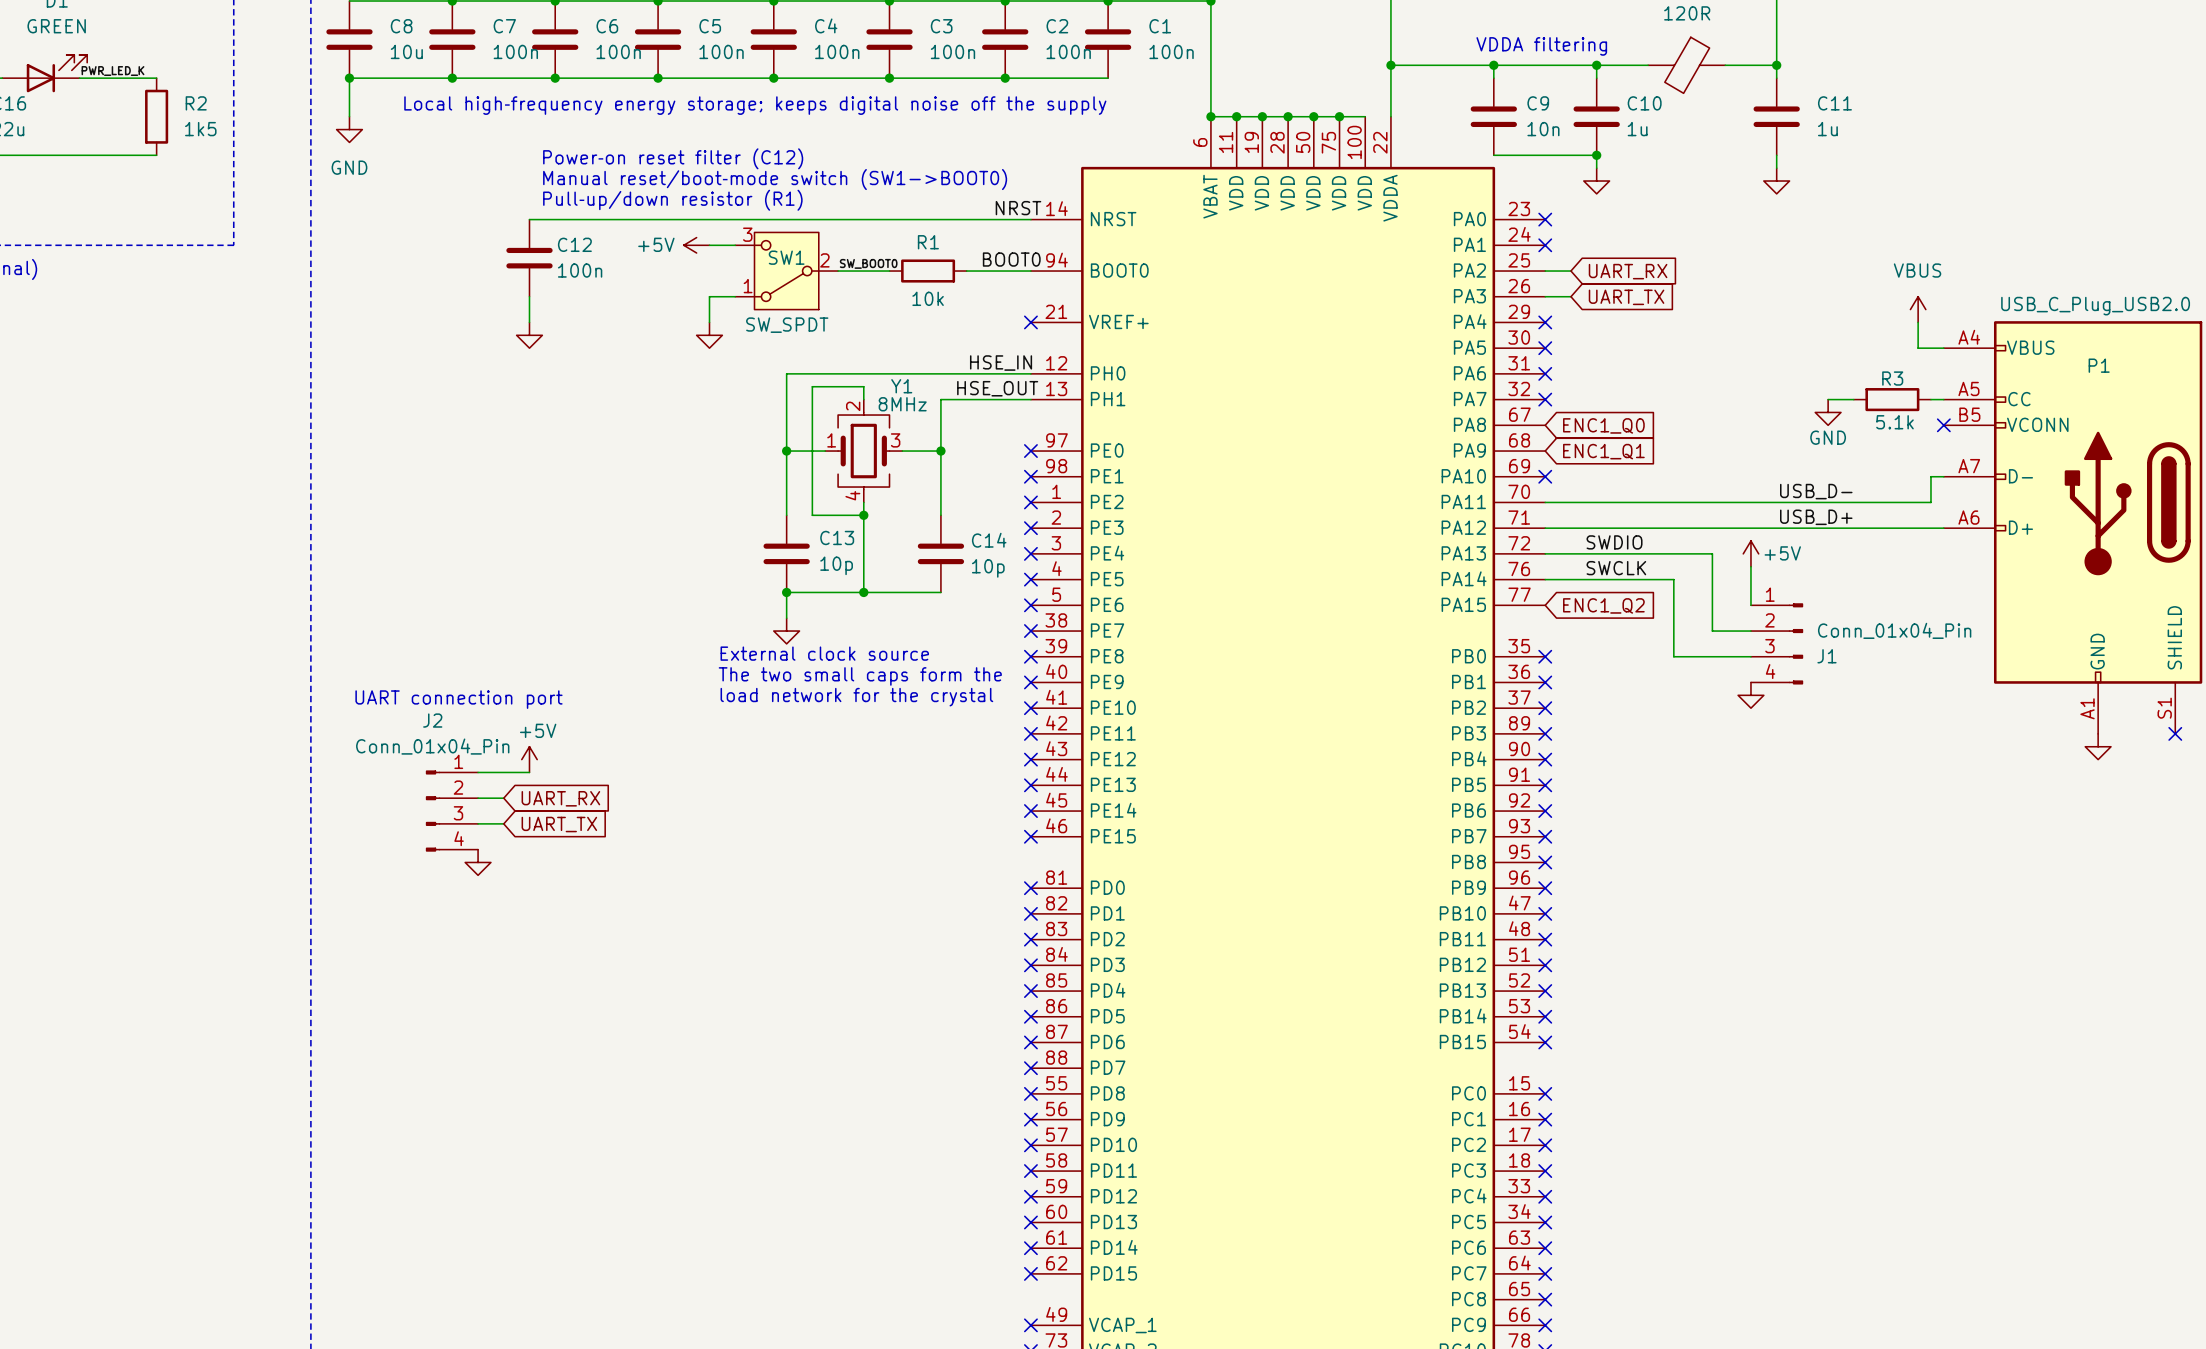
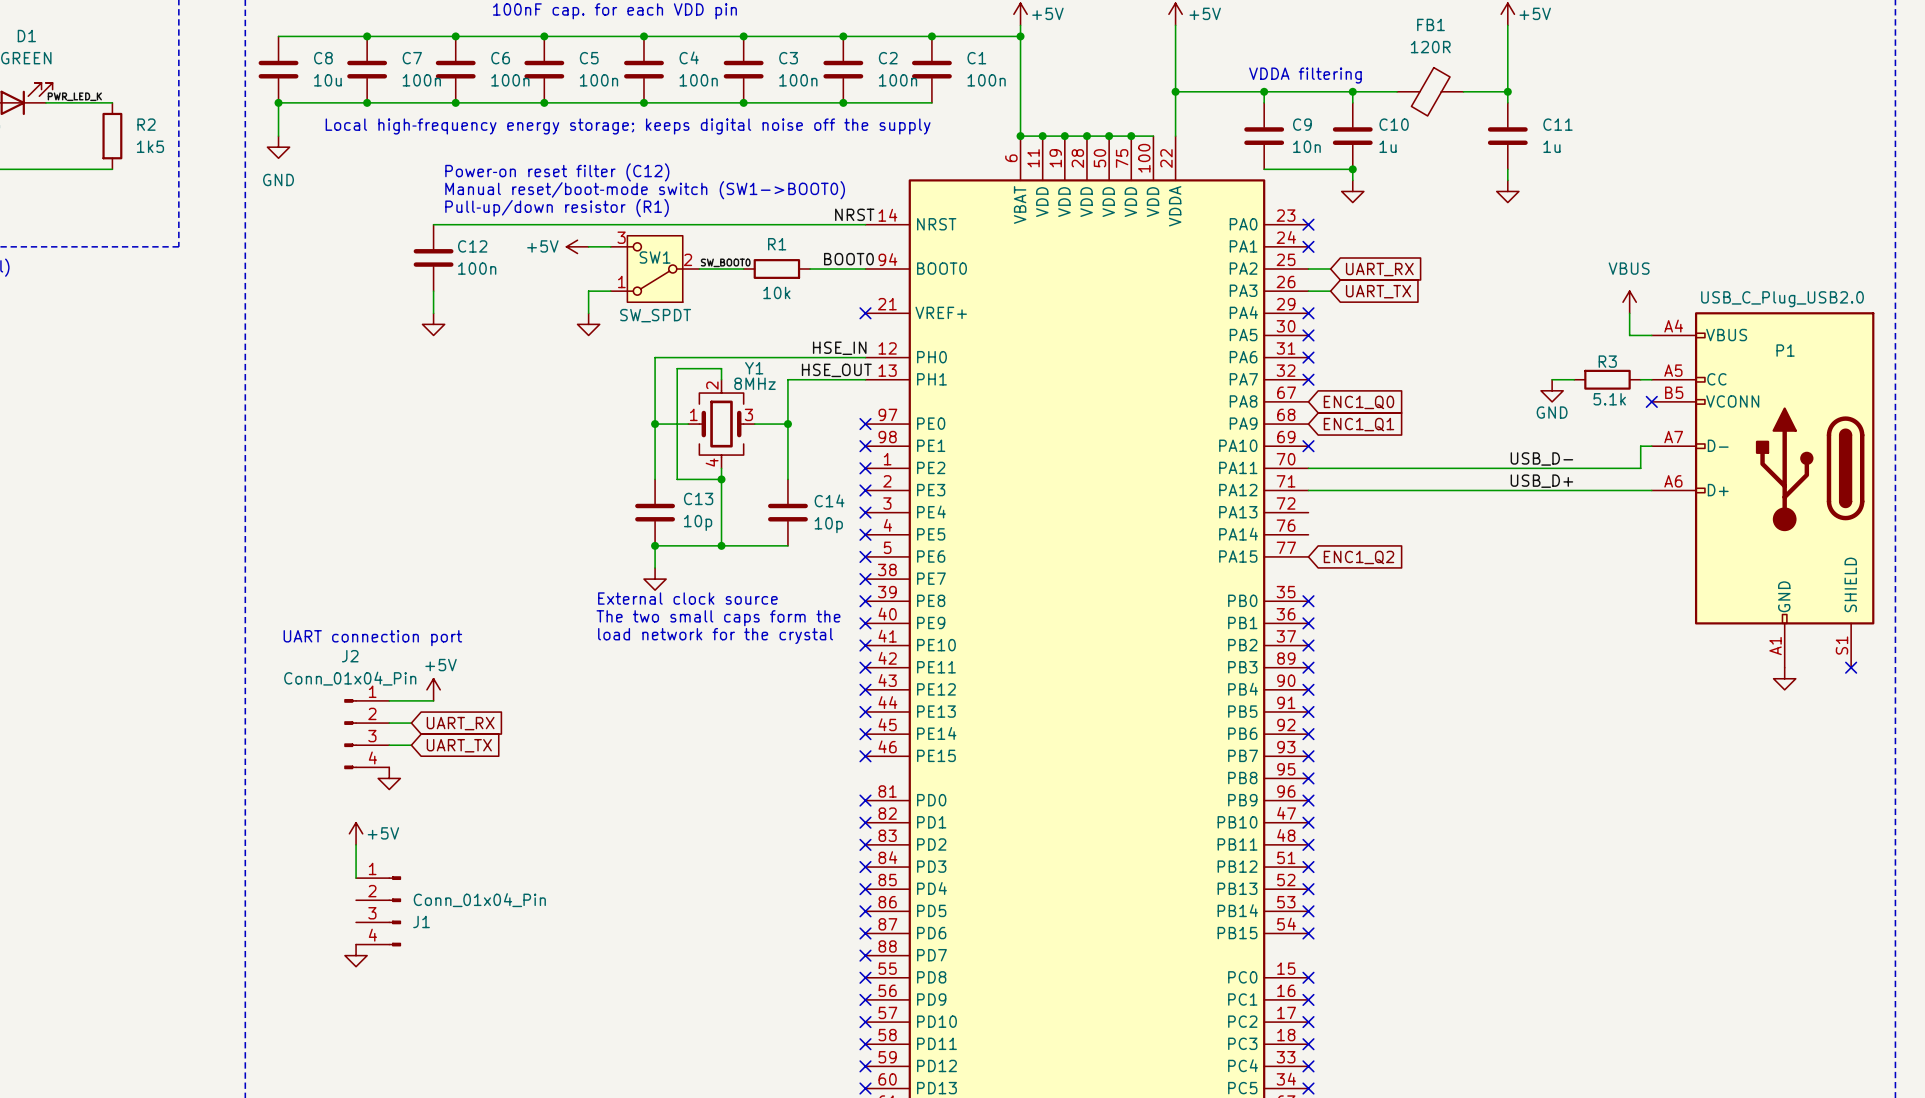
label: SWDIO (1614, 542) -> none
wire: (1545, 553) (1712, 553) (1712, 631) (1750, 631) -> none
power symbol: +5V (1750, 553) -> none
wire: (1750, 566) (1750, 605) -> none
label: SWCLK (1616, 568) -> none
wire: (1545, 579) (1673, 579) (1673, 656) (1750, 656) -> none
J1 position: (1777, 643) -> (378, 911)
power symbol: (1750, 695) -> none
power symbol: none -> +5V (356, 833)
wire: none -> (356, 844) (356, 878)
power symbol: none -> (356, 955)

